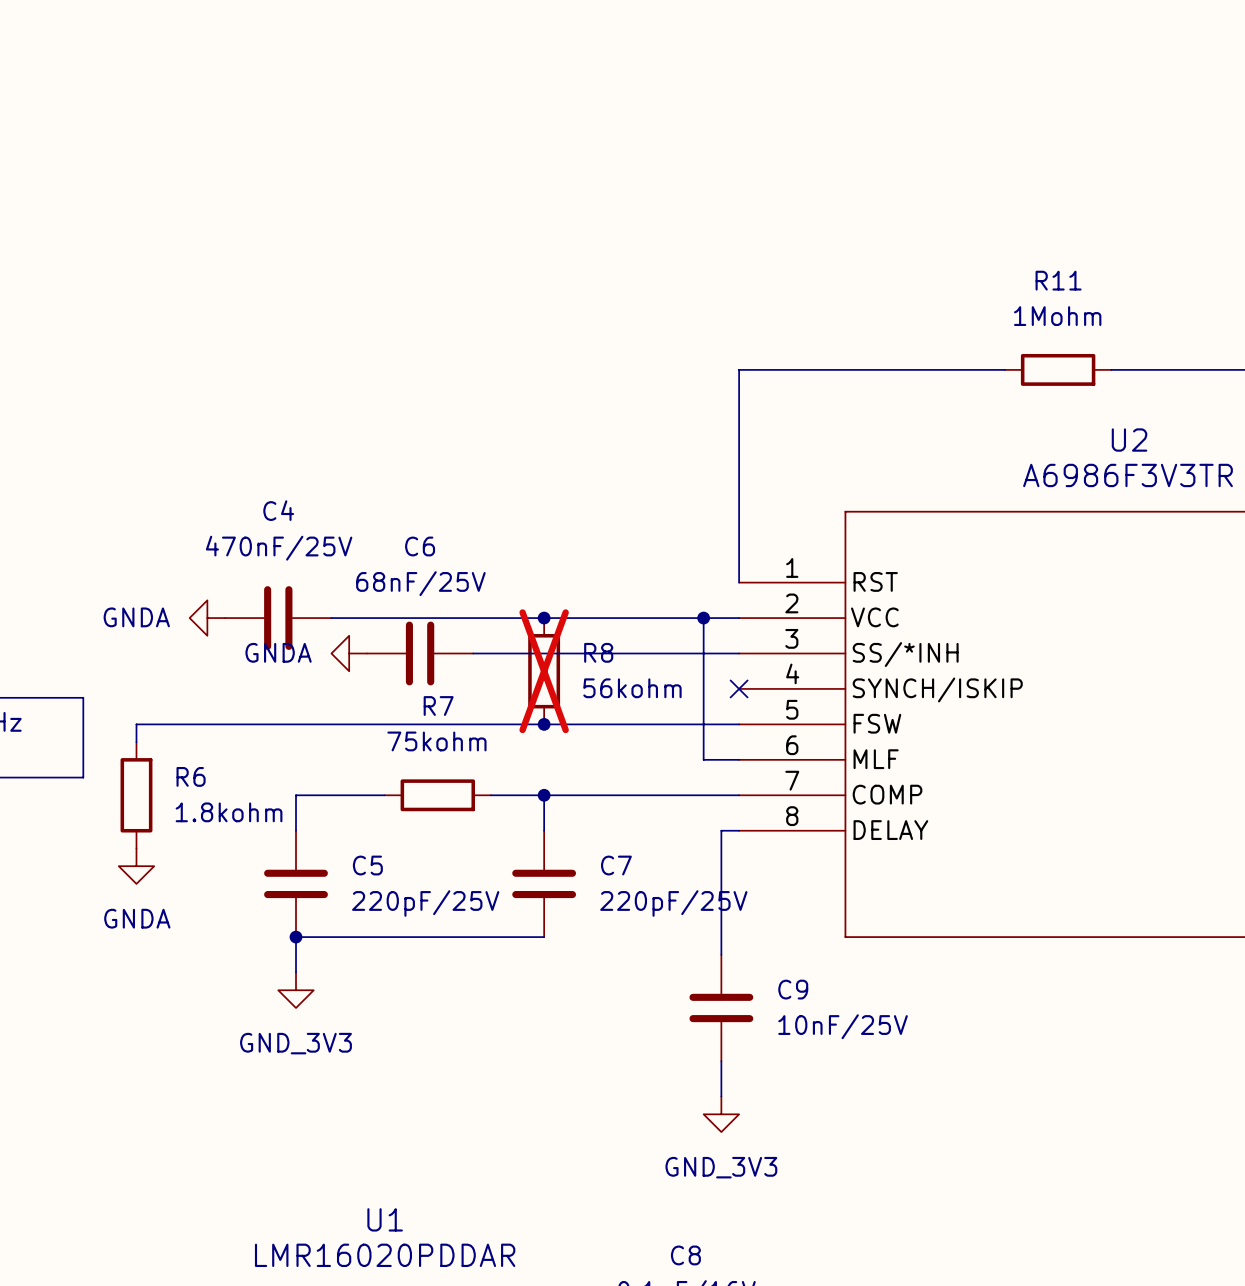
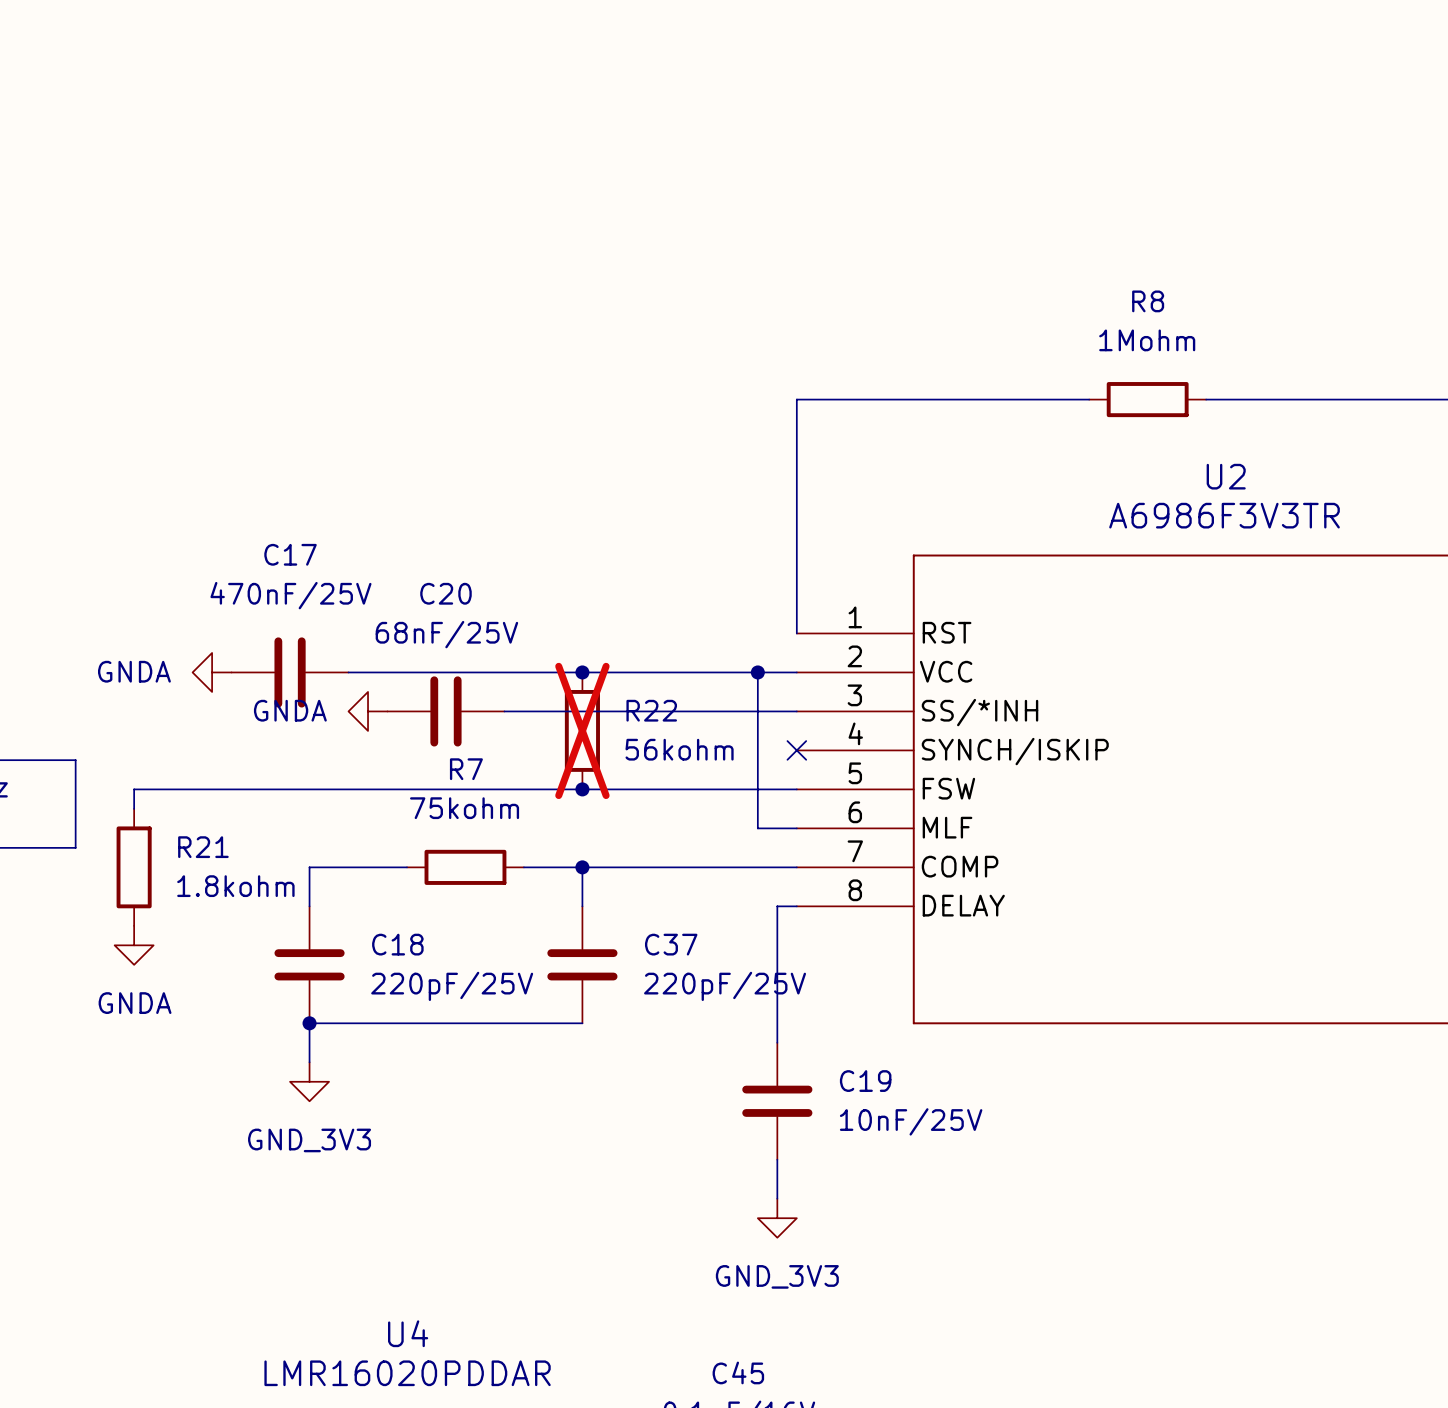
R11 name: R11 (1058, 280) -> R8 (1148, 301)
C4 name: C4 (278, 510) -> C17 (290, 554)
C6 name: C6 (420, 546) -> C20 (445, 593)
R8 name: R8 (598, 652) -> R22 (651, 710)
R6 name: R6 (191, 776) -> R21 (203, 847)
C5 name: C5 (367, 865) -> C18 (397, 944)
C7 name: C7 (616, 865) -> C37 (671, 944)
C9 name: C9 (793, 989) -> C19 (865, 1081)
U1 name: U1 (385, 1219) -> U4 (408, 1333)
C8 name: C8 (685, 1255) -> C45 (738, 1372)

